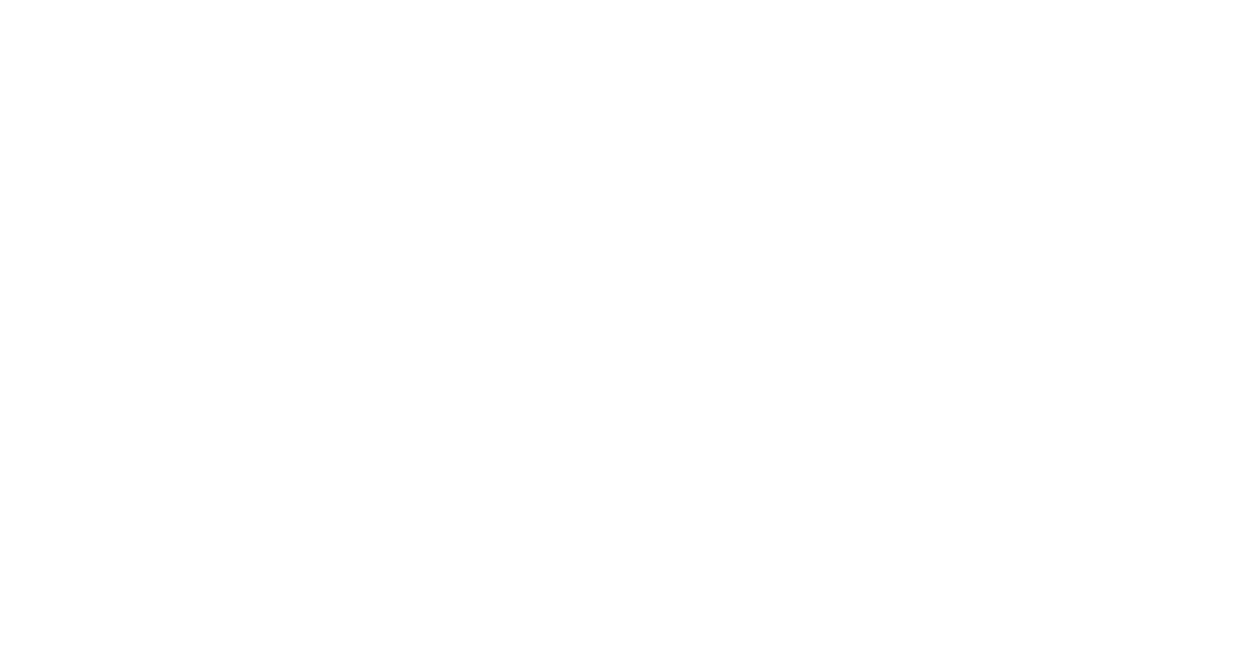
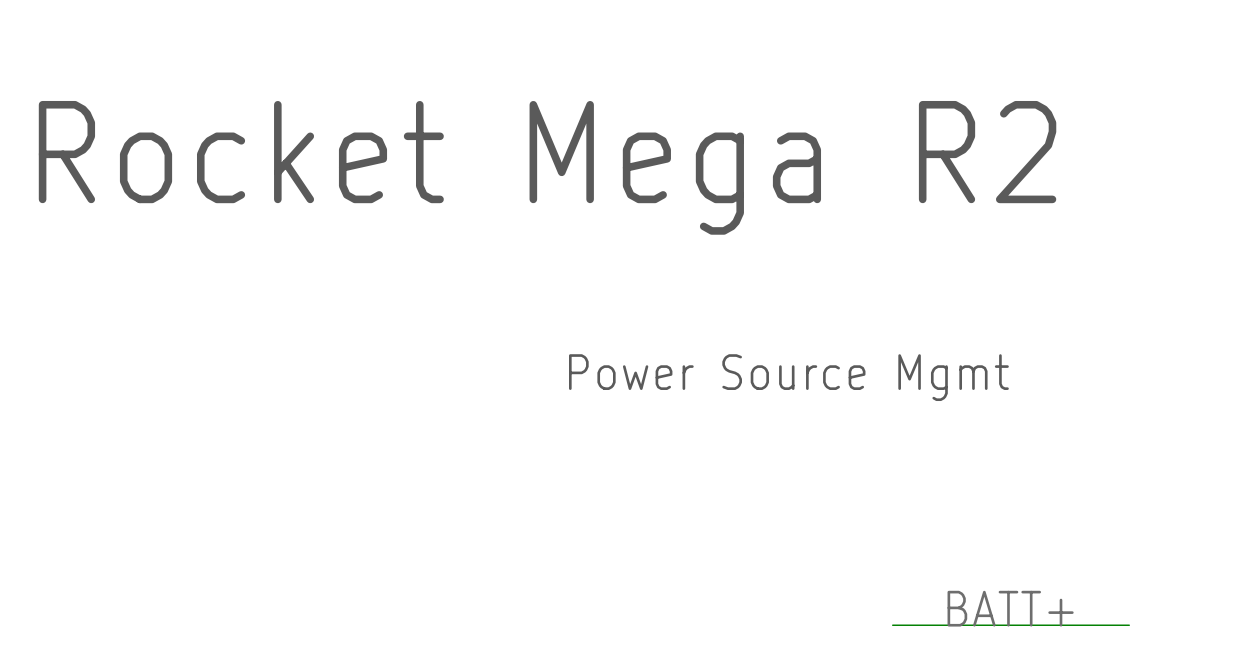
text: none -> Rocket Mega R2 (547, 167)
text: none -> Power Source Mgmt (788, 377)
label: none -> BATT+ (1010, 608)
wire: none -> (892, 625) (1129, 625)

